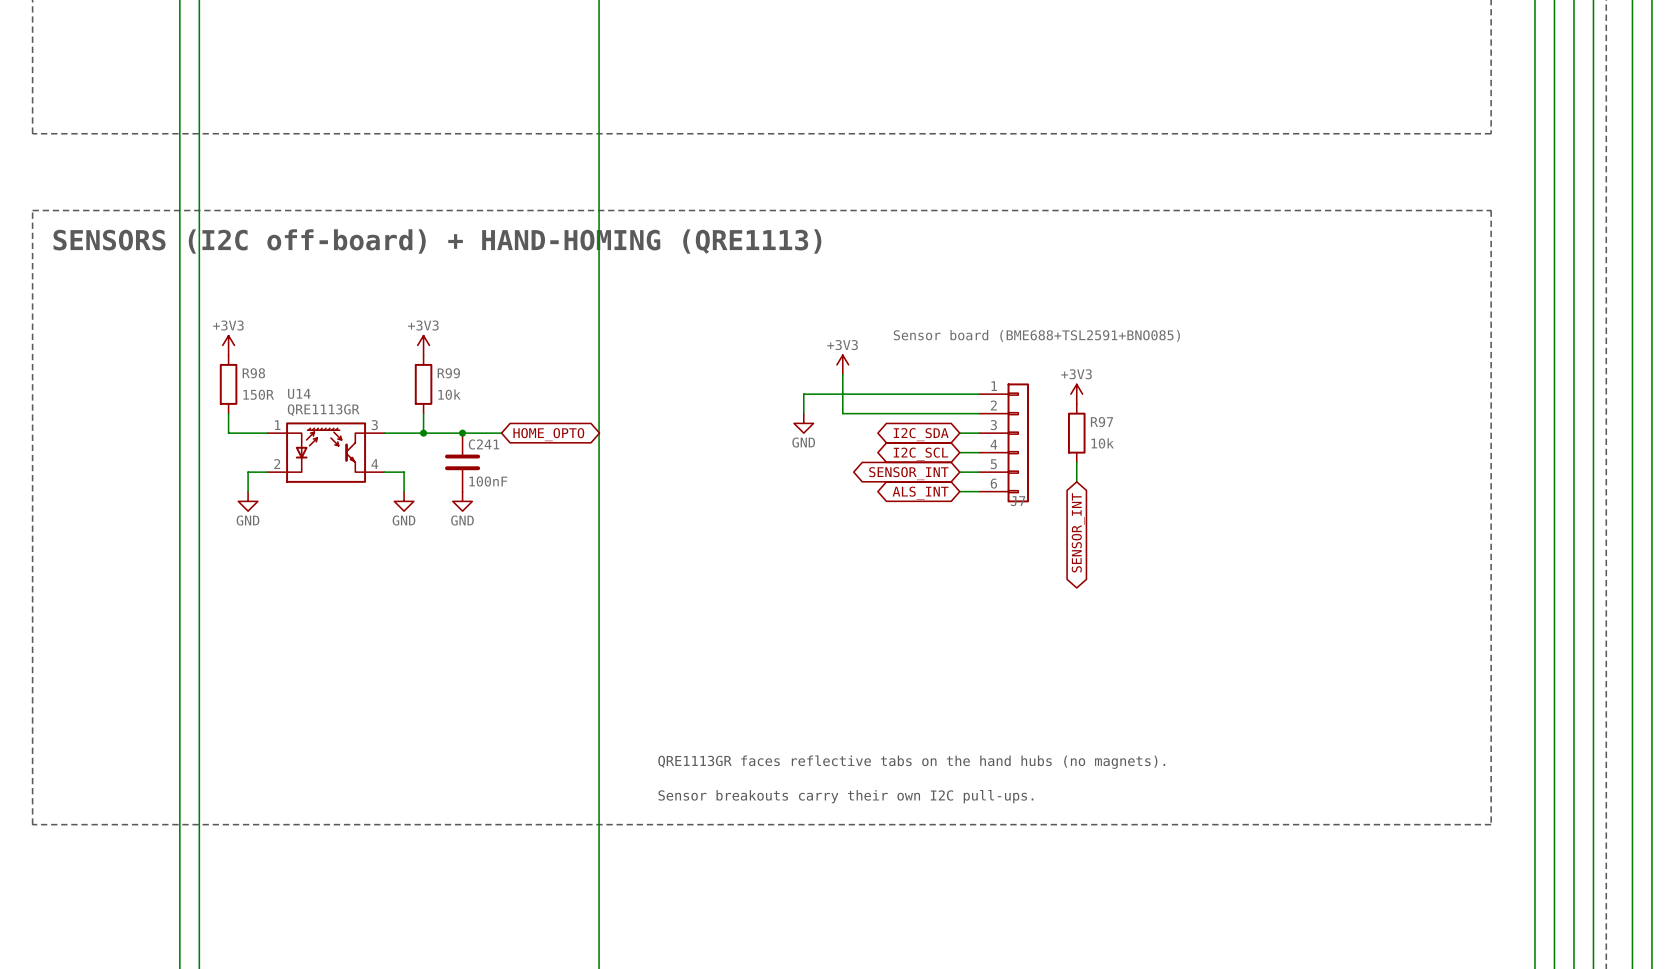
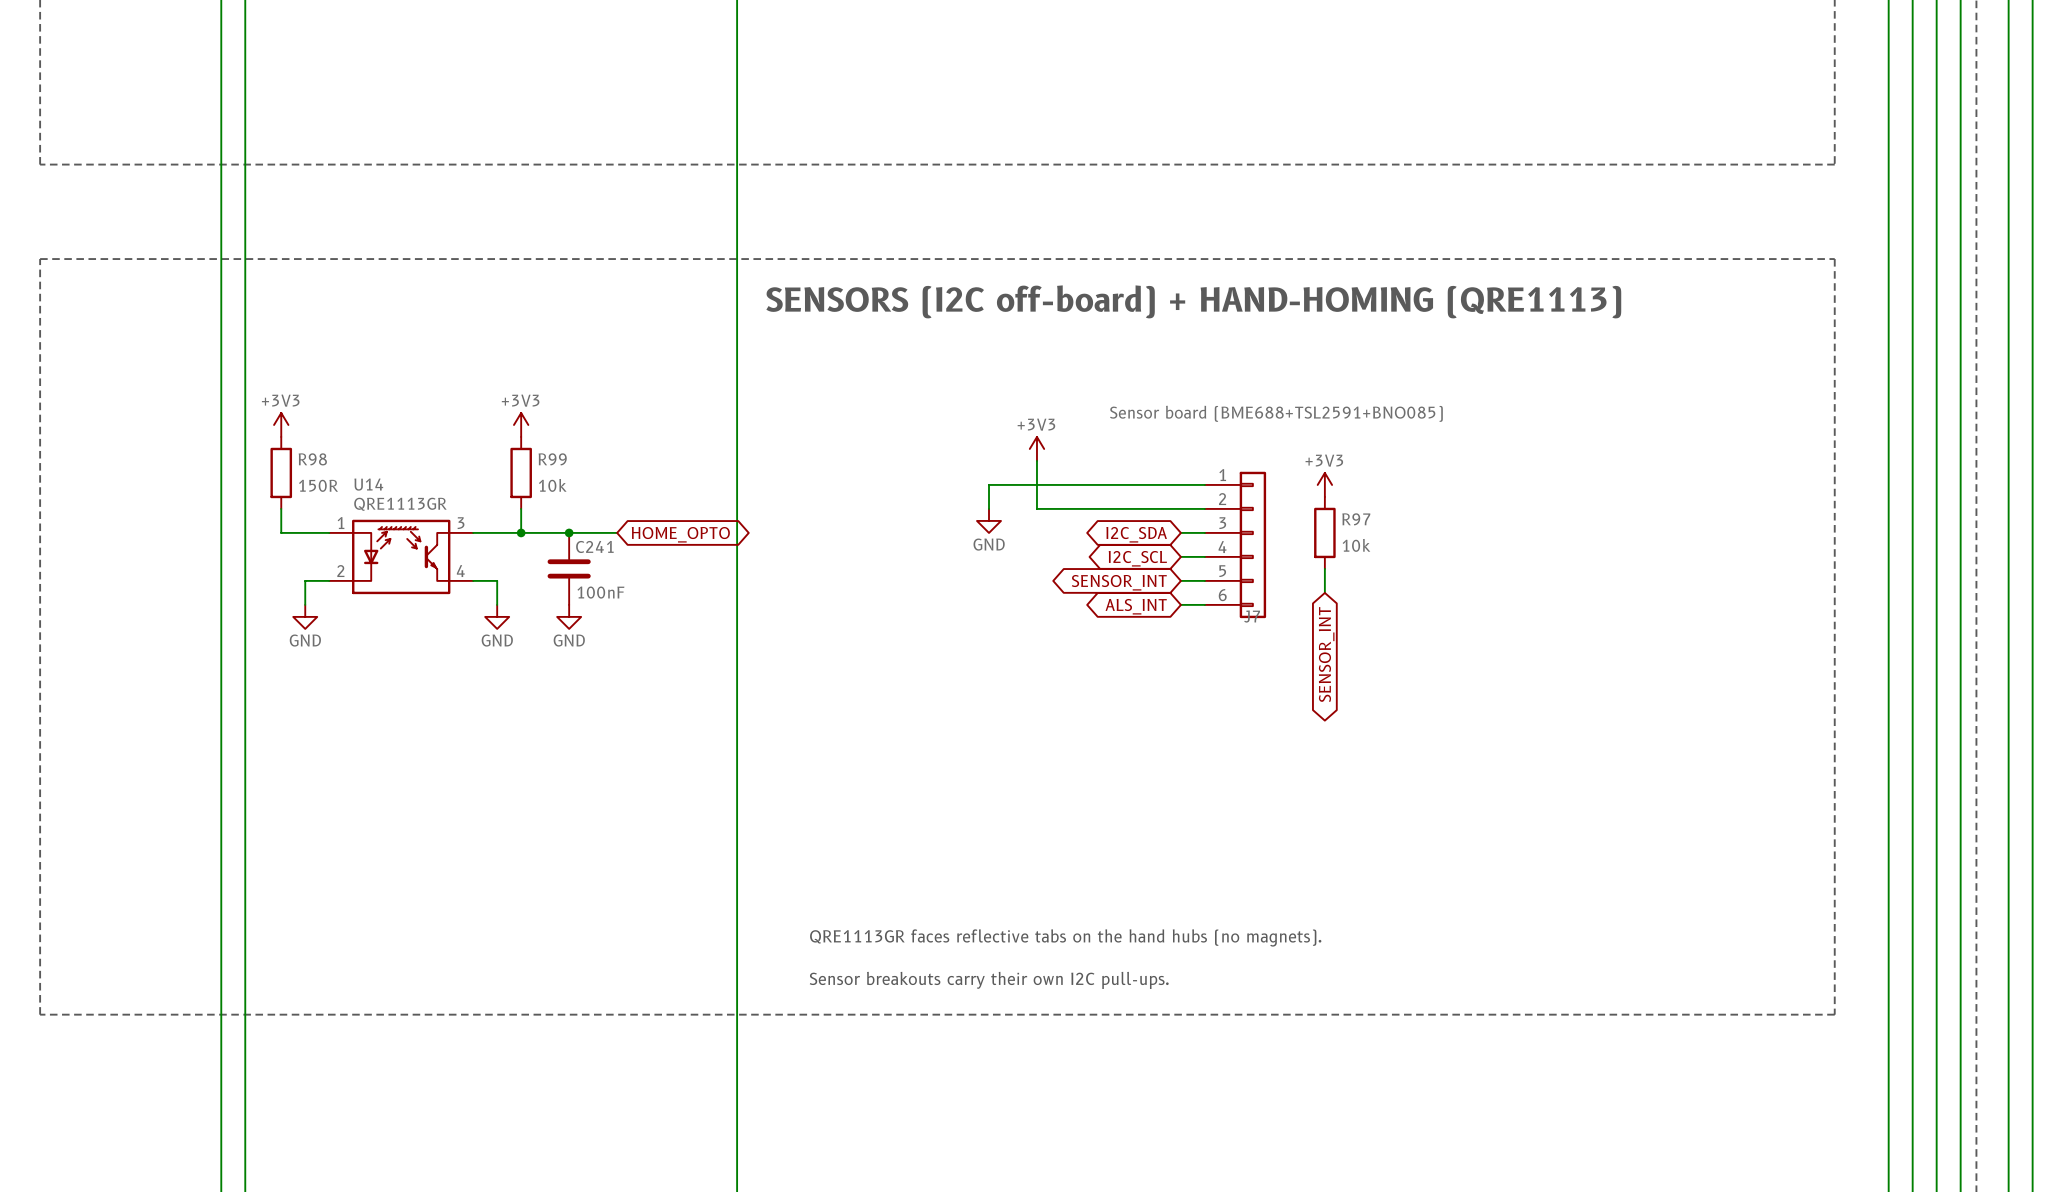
text: SENSORS (I2C off-board) + HAND-HOMING (QRE1113) (437, 241) -> none
text: none -> SENSORS (I2C off-board) + HAND-HOMING (QRE1113) (1193, 301)

